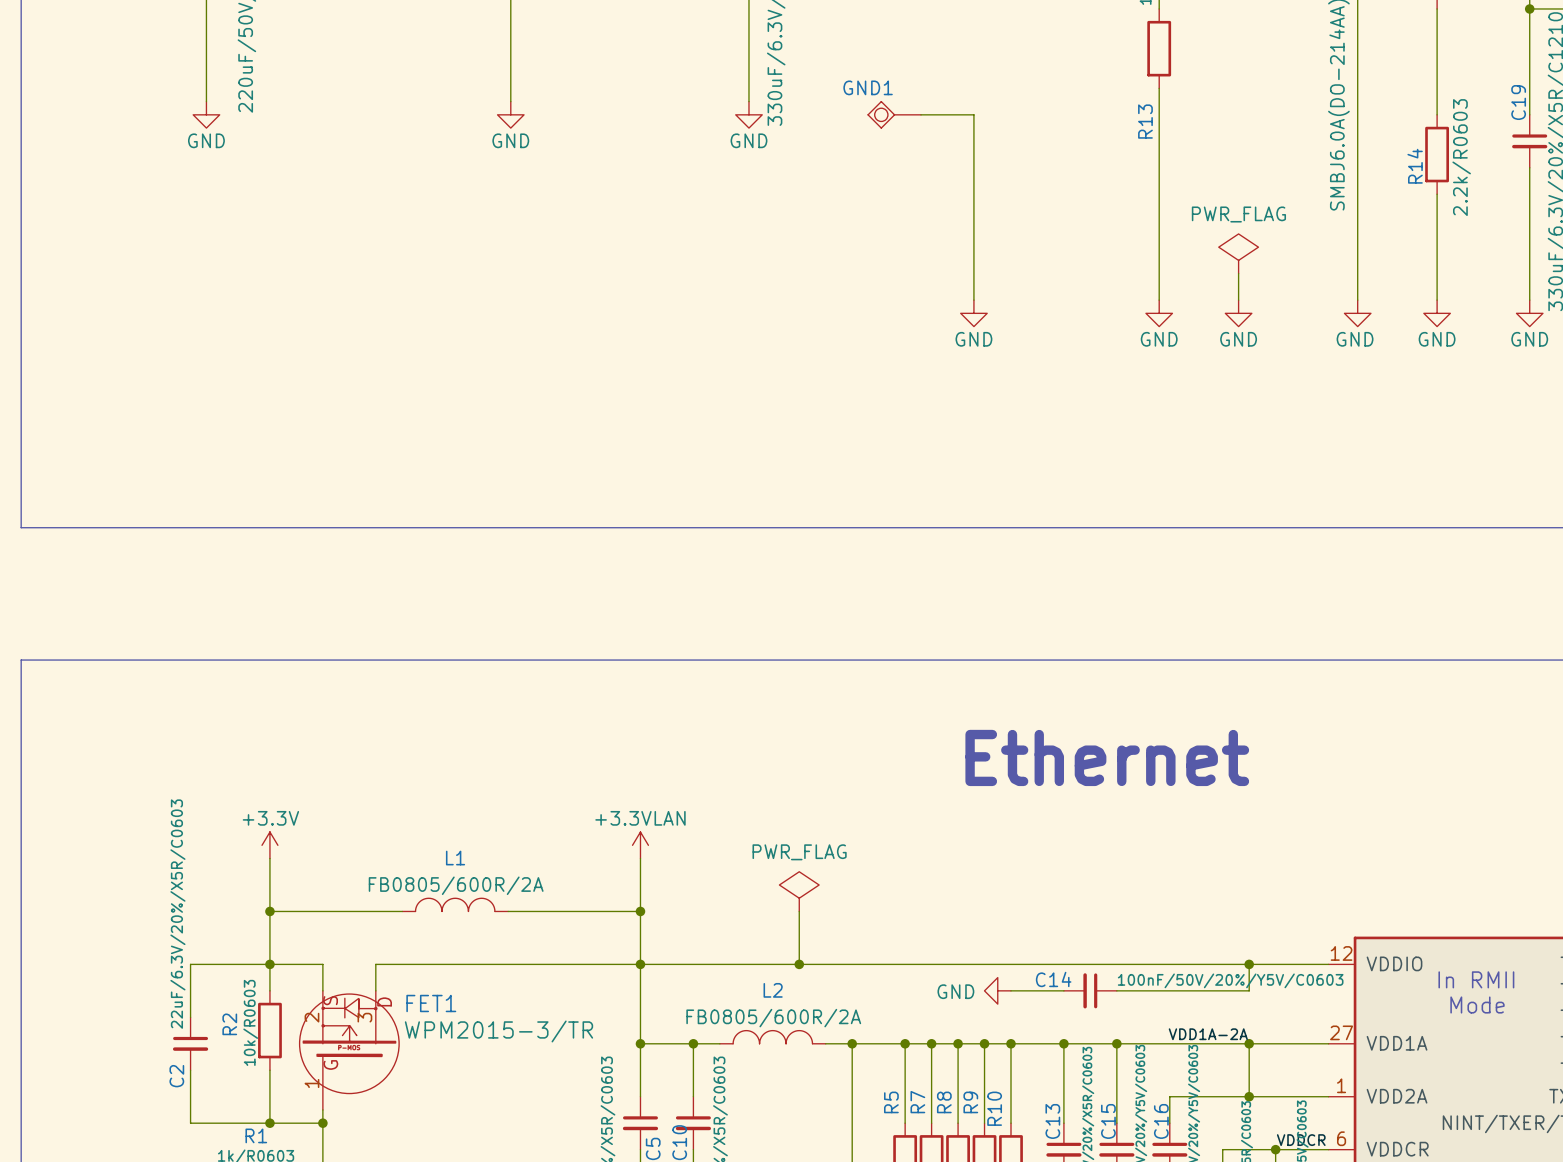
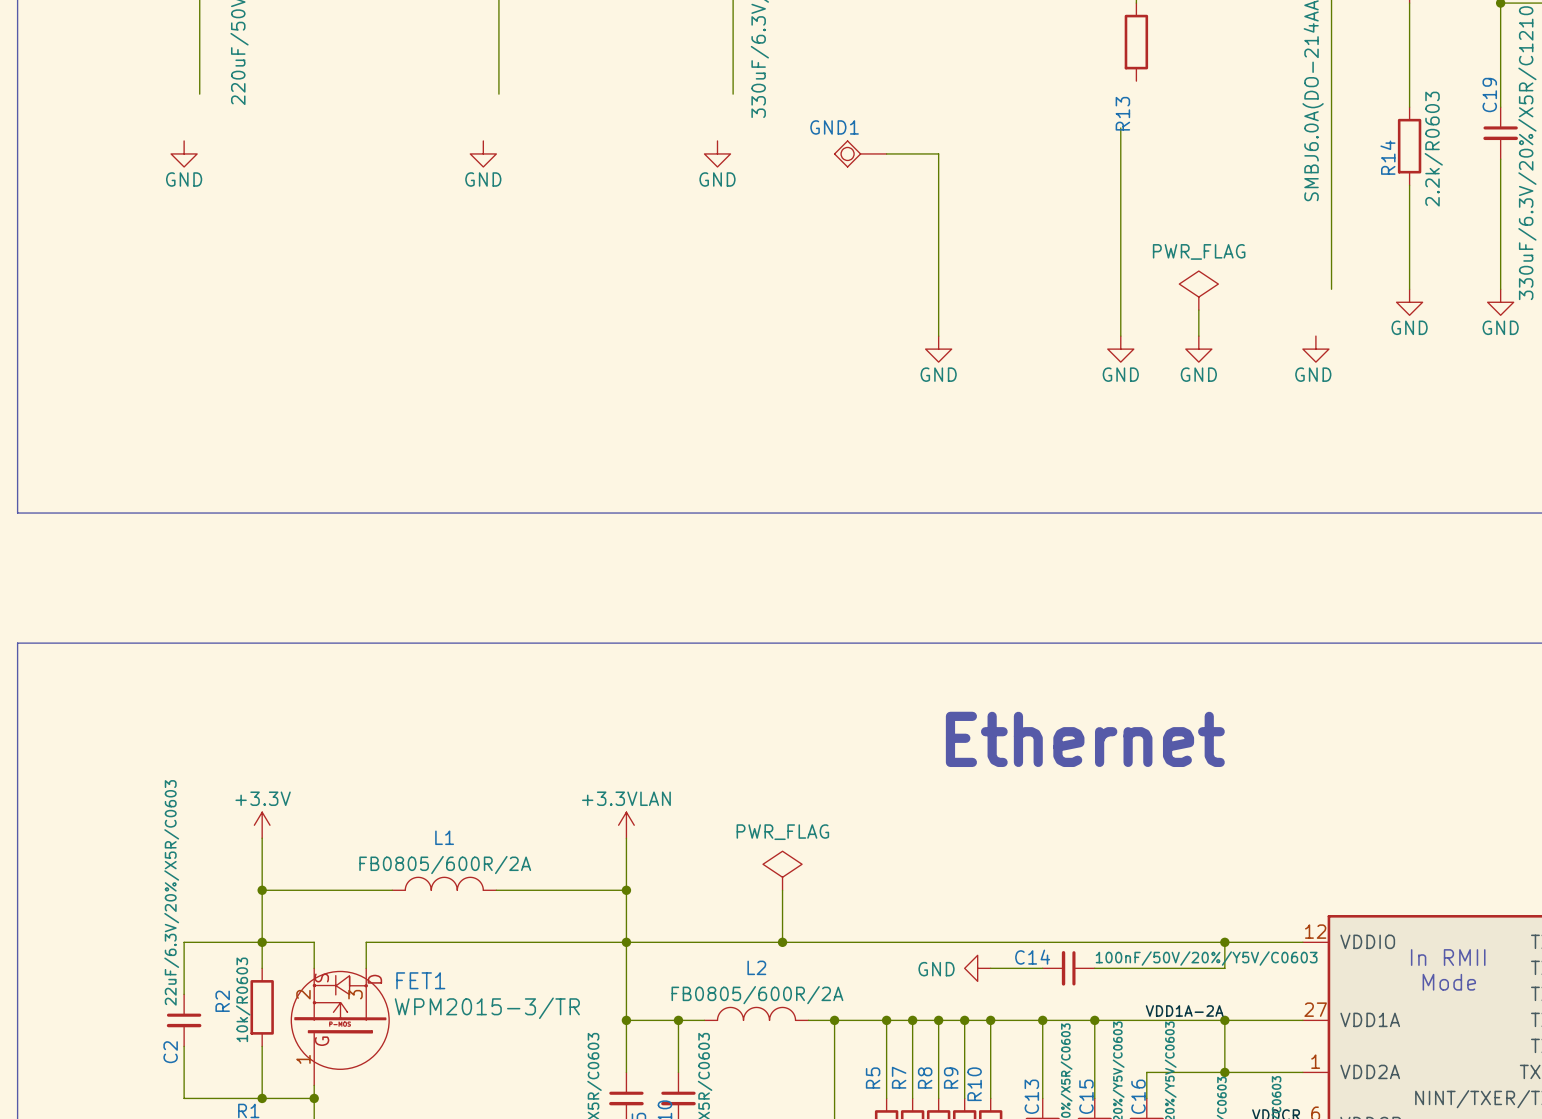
wire: (1159, 88) (1159, 300) -> (1120, 127) (1120, 336)
power symbol position: GND (206, 114) -> GND (184, 153)
power symbol position: GND (510, 114) -> GND (483, 153)
power symbol position: GND (748, 114) -> GND (717, 153)
GND1 position: (894, 114) -> (860, 153)
wire: (921, 114) (973, 114) (973, 300) -> (886, 153) (938, 153) (938, 336)
power symbol position: PWR_FLAG (1238, 253) -> PWR_FLAG (1198, 290)
wire: (1238, 273) (1238, 300) -> (1198, 310) (1198, 336)
power symbol position: GND (973, 313) -> GND (938, 349)
power symbol: GND (1159, 313) -> none
power symbol: GND (1238, 313) -> none
power symbol position: GND (1357, 313) -> GND (1315, 349)
power symbol: none -> GND (1120, 349)
power symbol: none -> GND (1198, 349)

